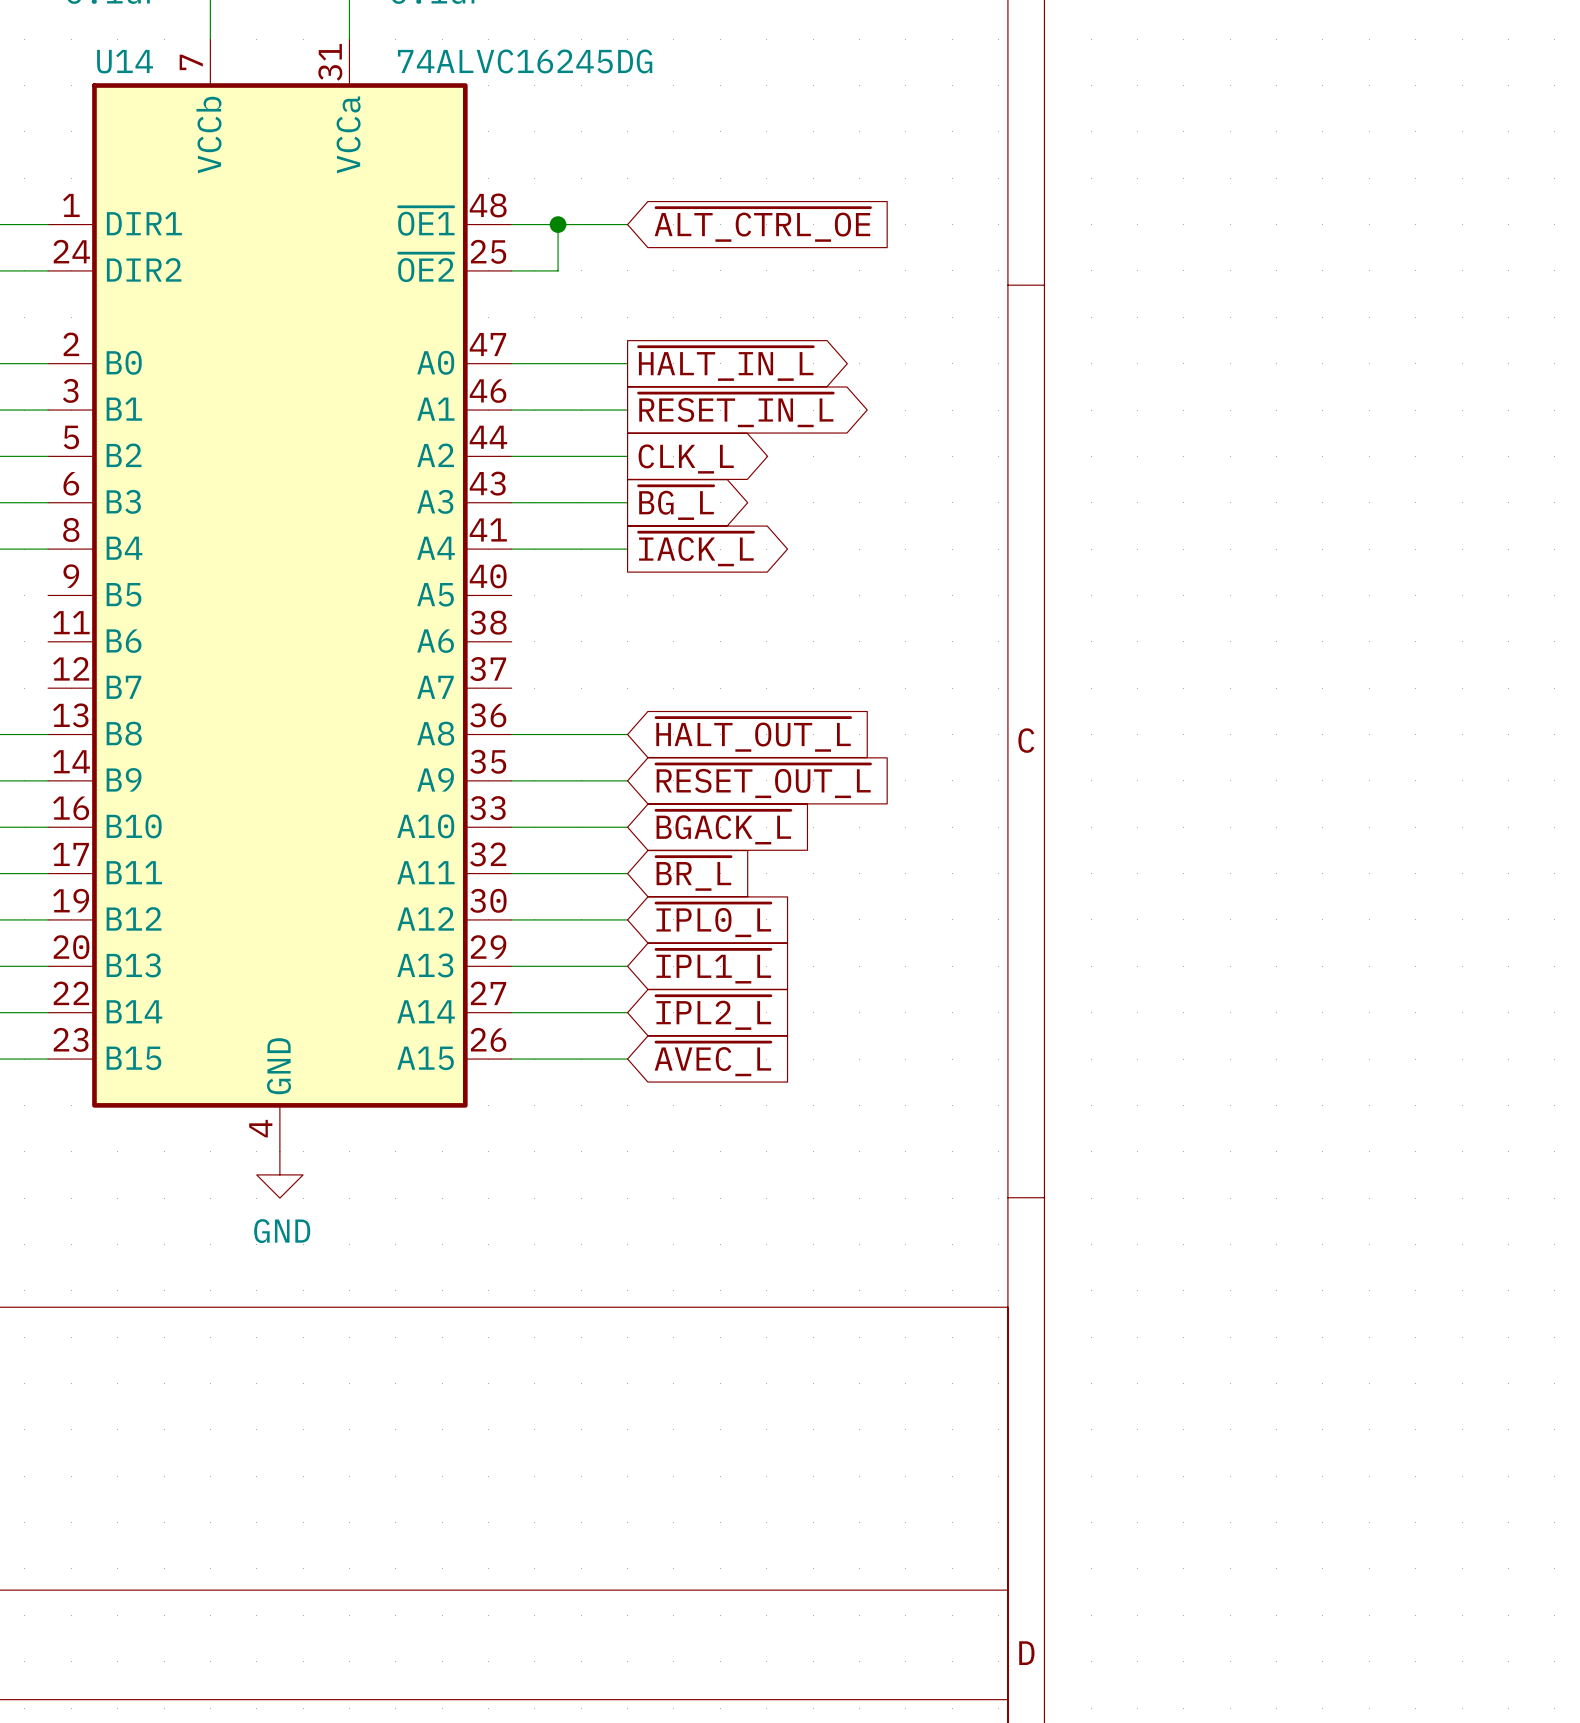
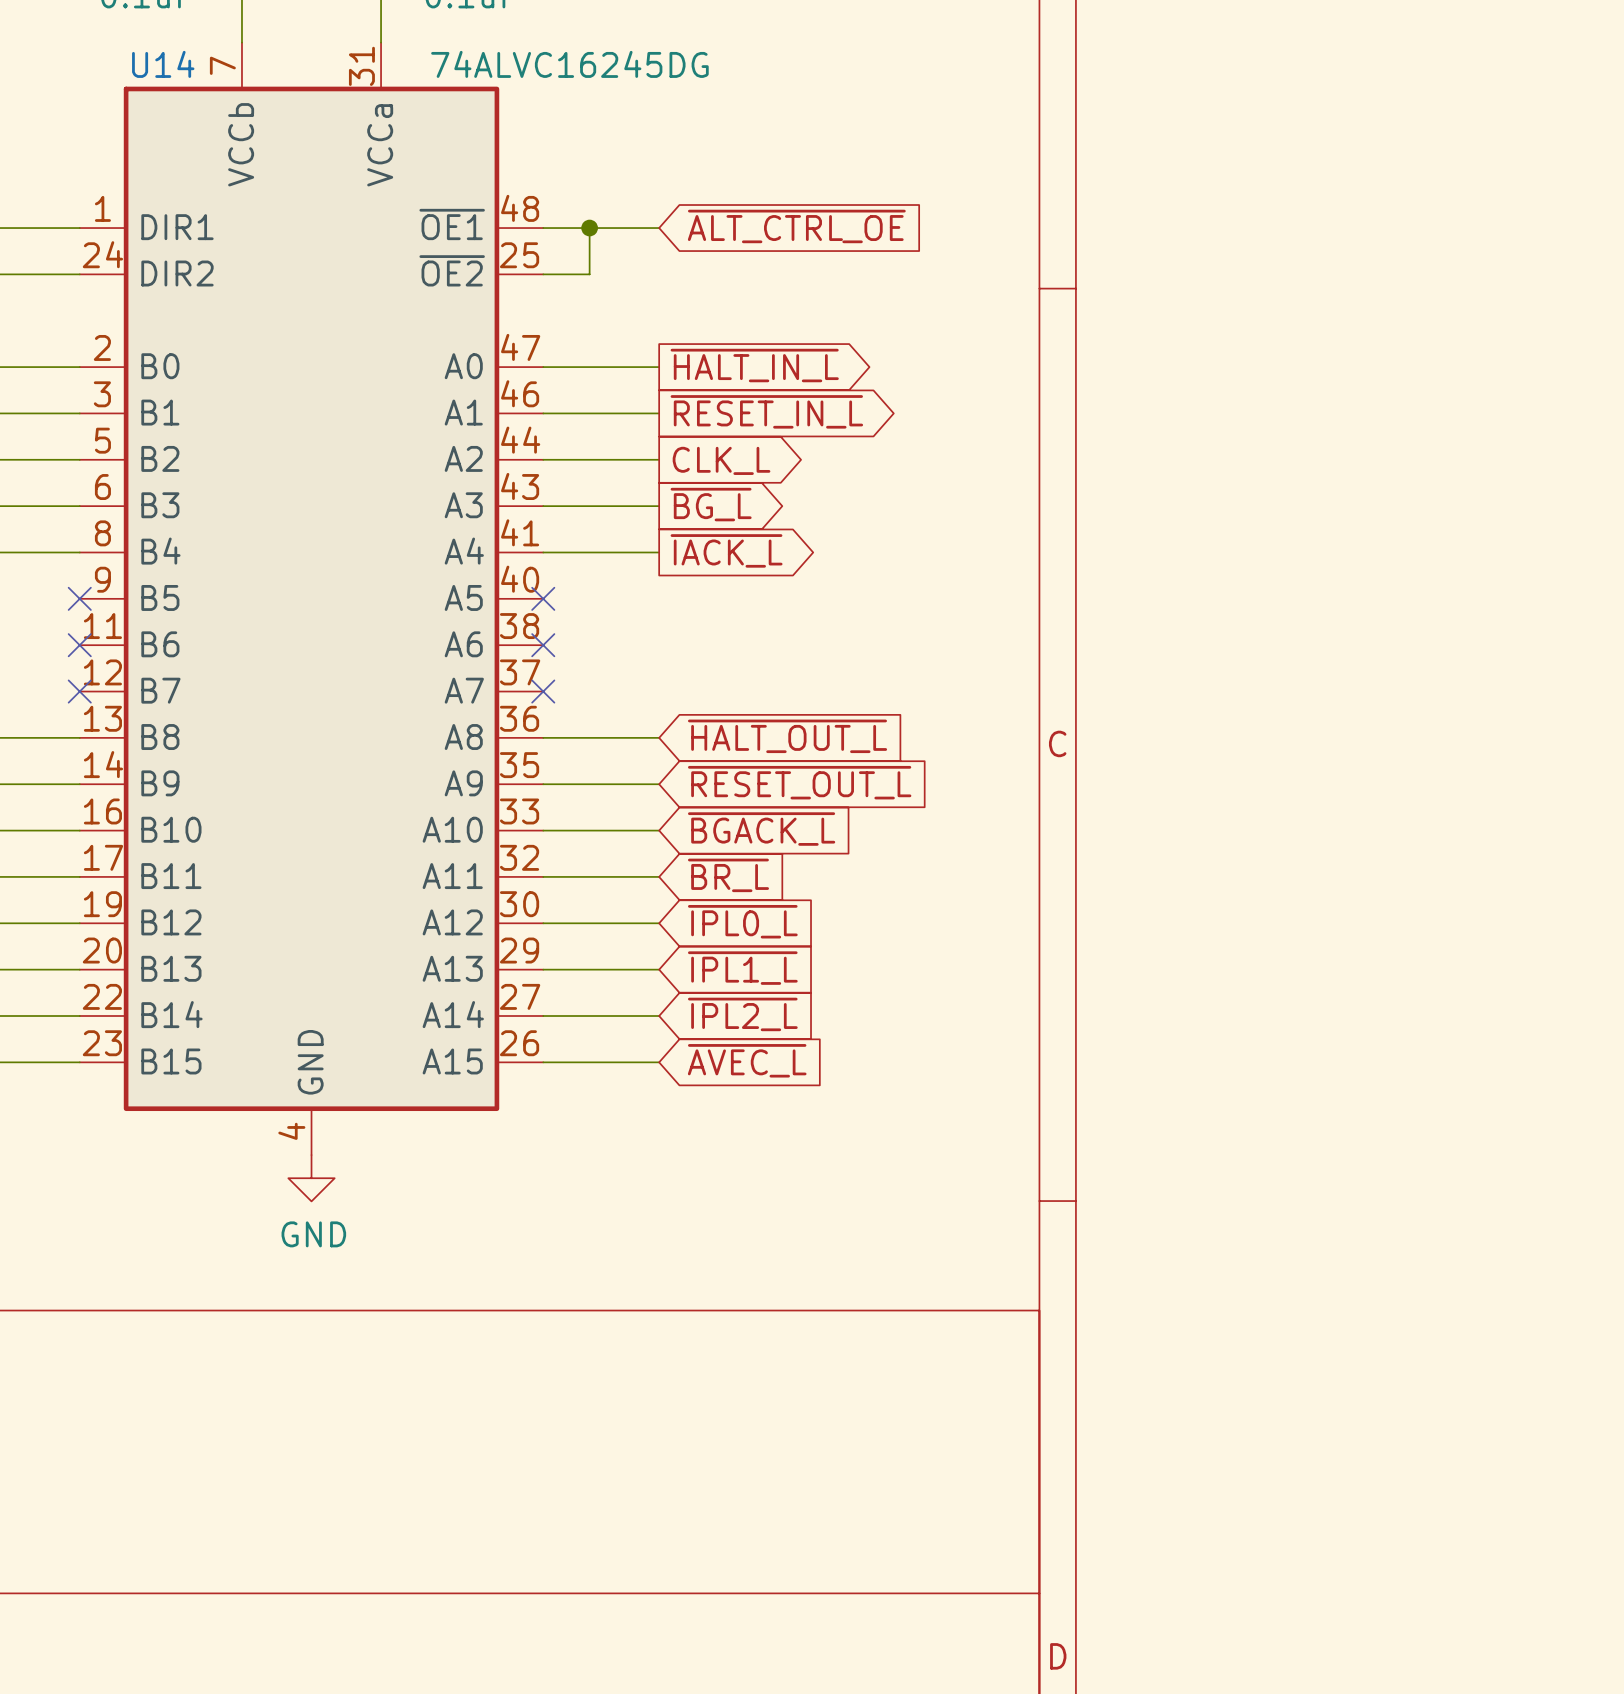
no-connect mark: none -> (79, 598)
no-connect mark: none -> (543, 598)
no-connect mark: none -> (79, 645)
no-connect mark: none -> (543, 645)
no-connect mark: none -> (79, 691)
no-connect mark: none -> (543, 691)

